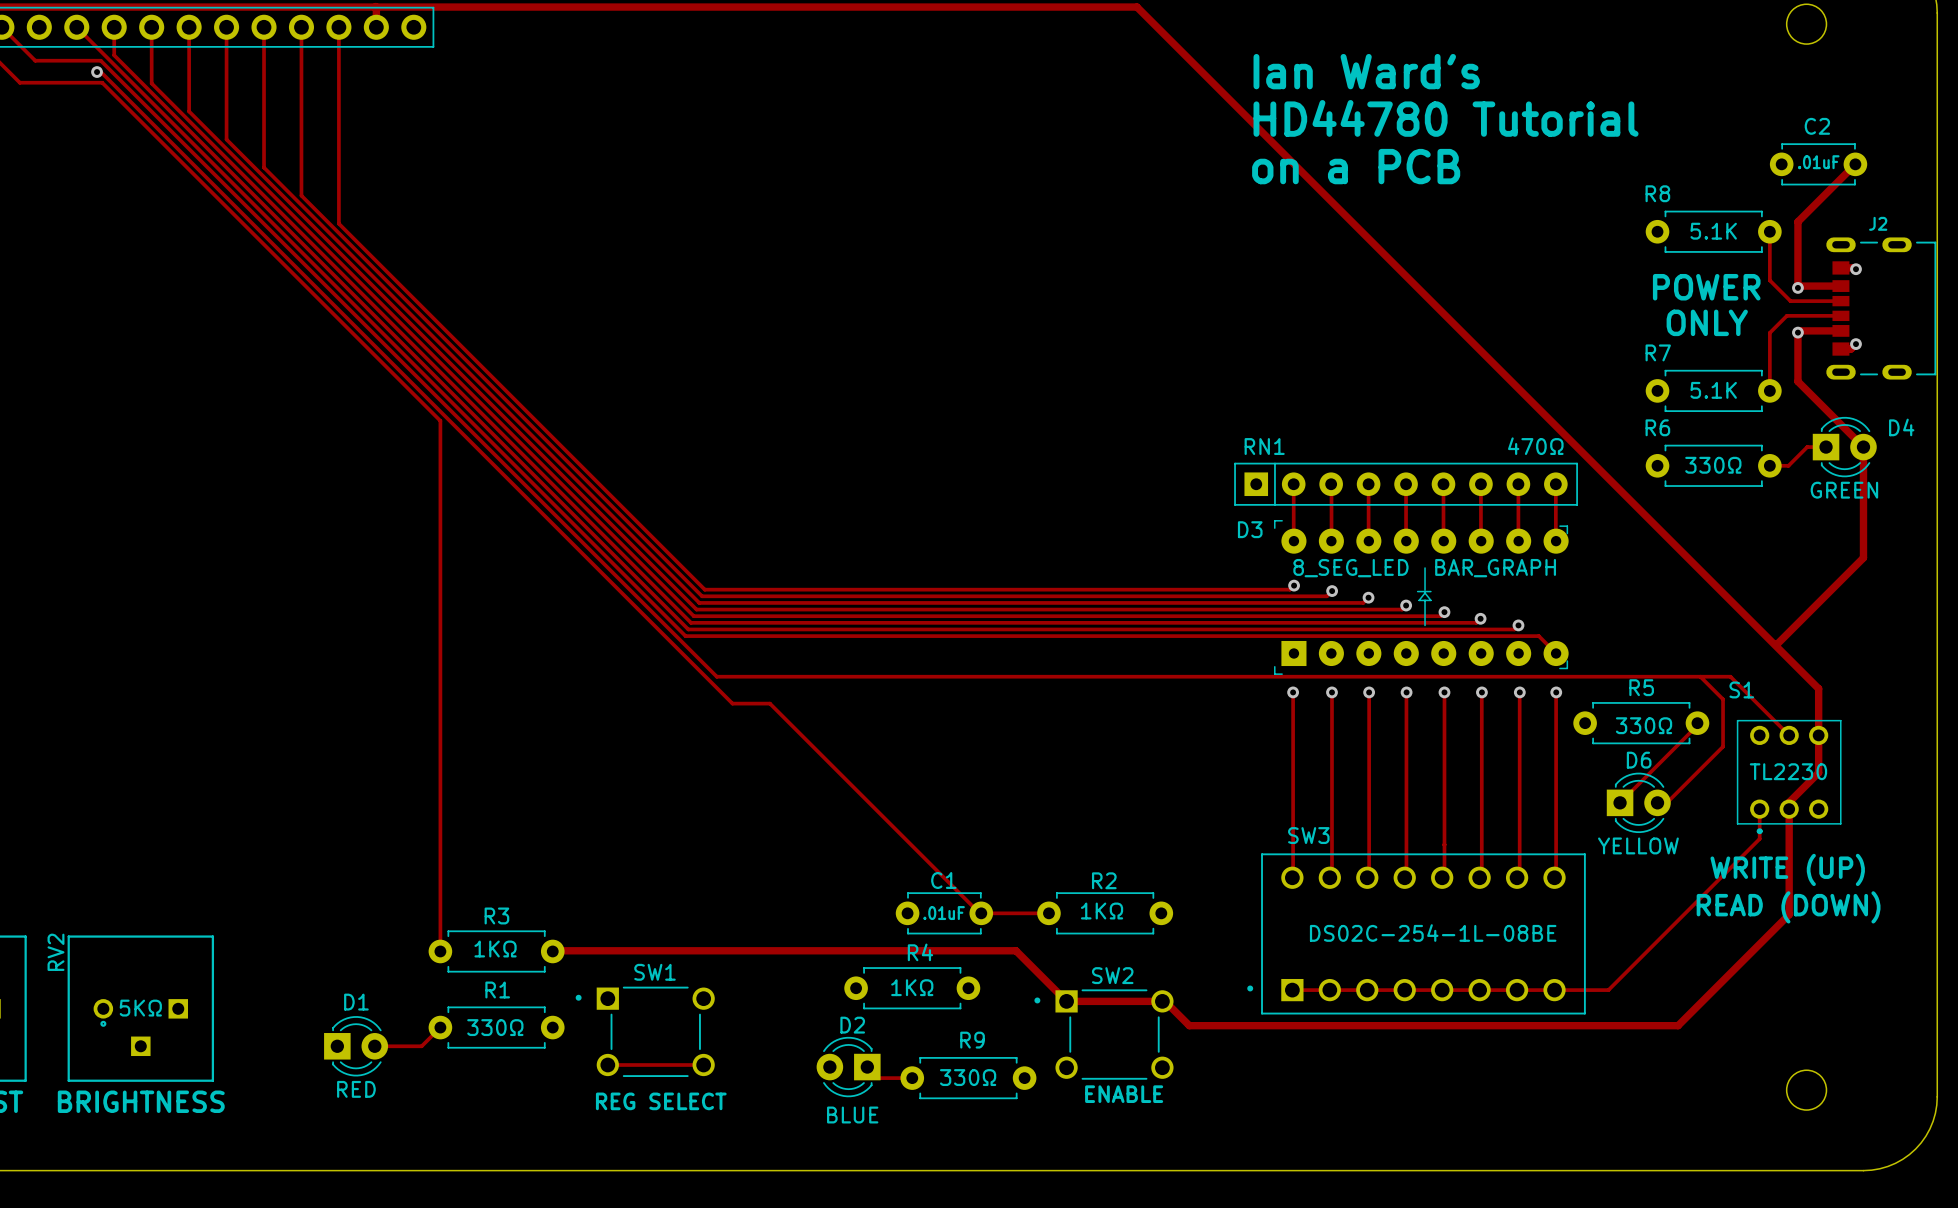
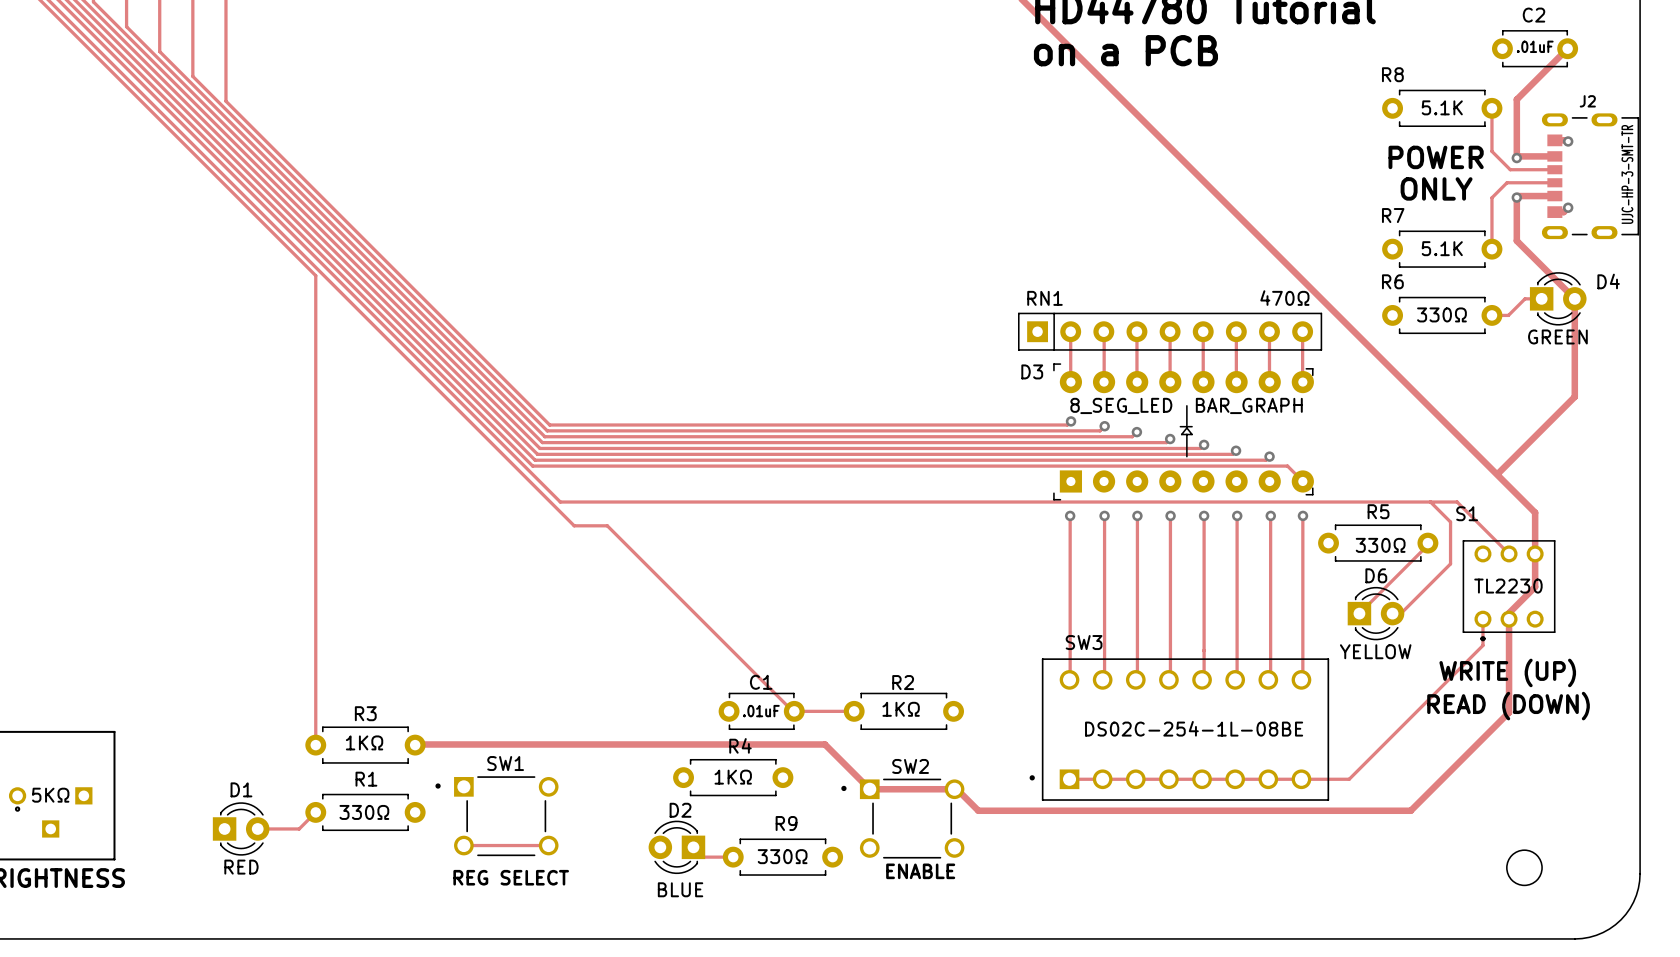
J2 value: none -> UJC-HP-3-SMT-TR (1627, 174)

